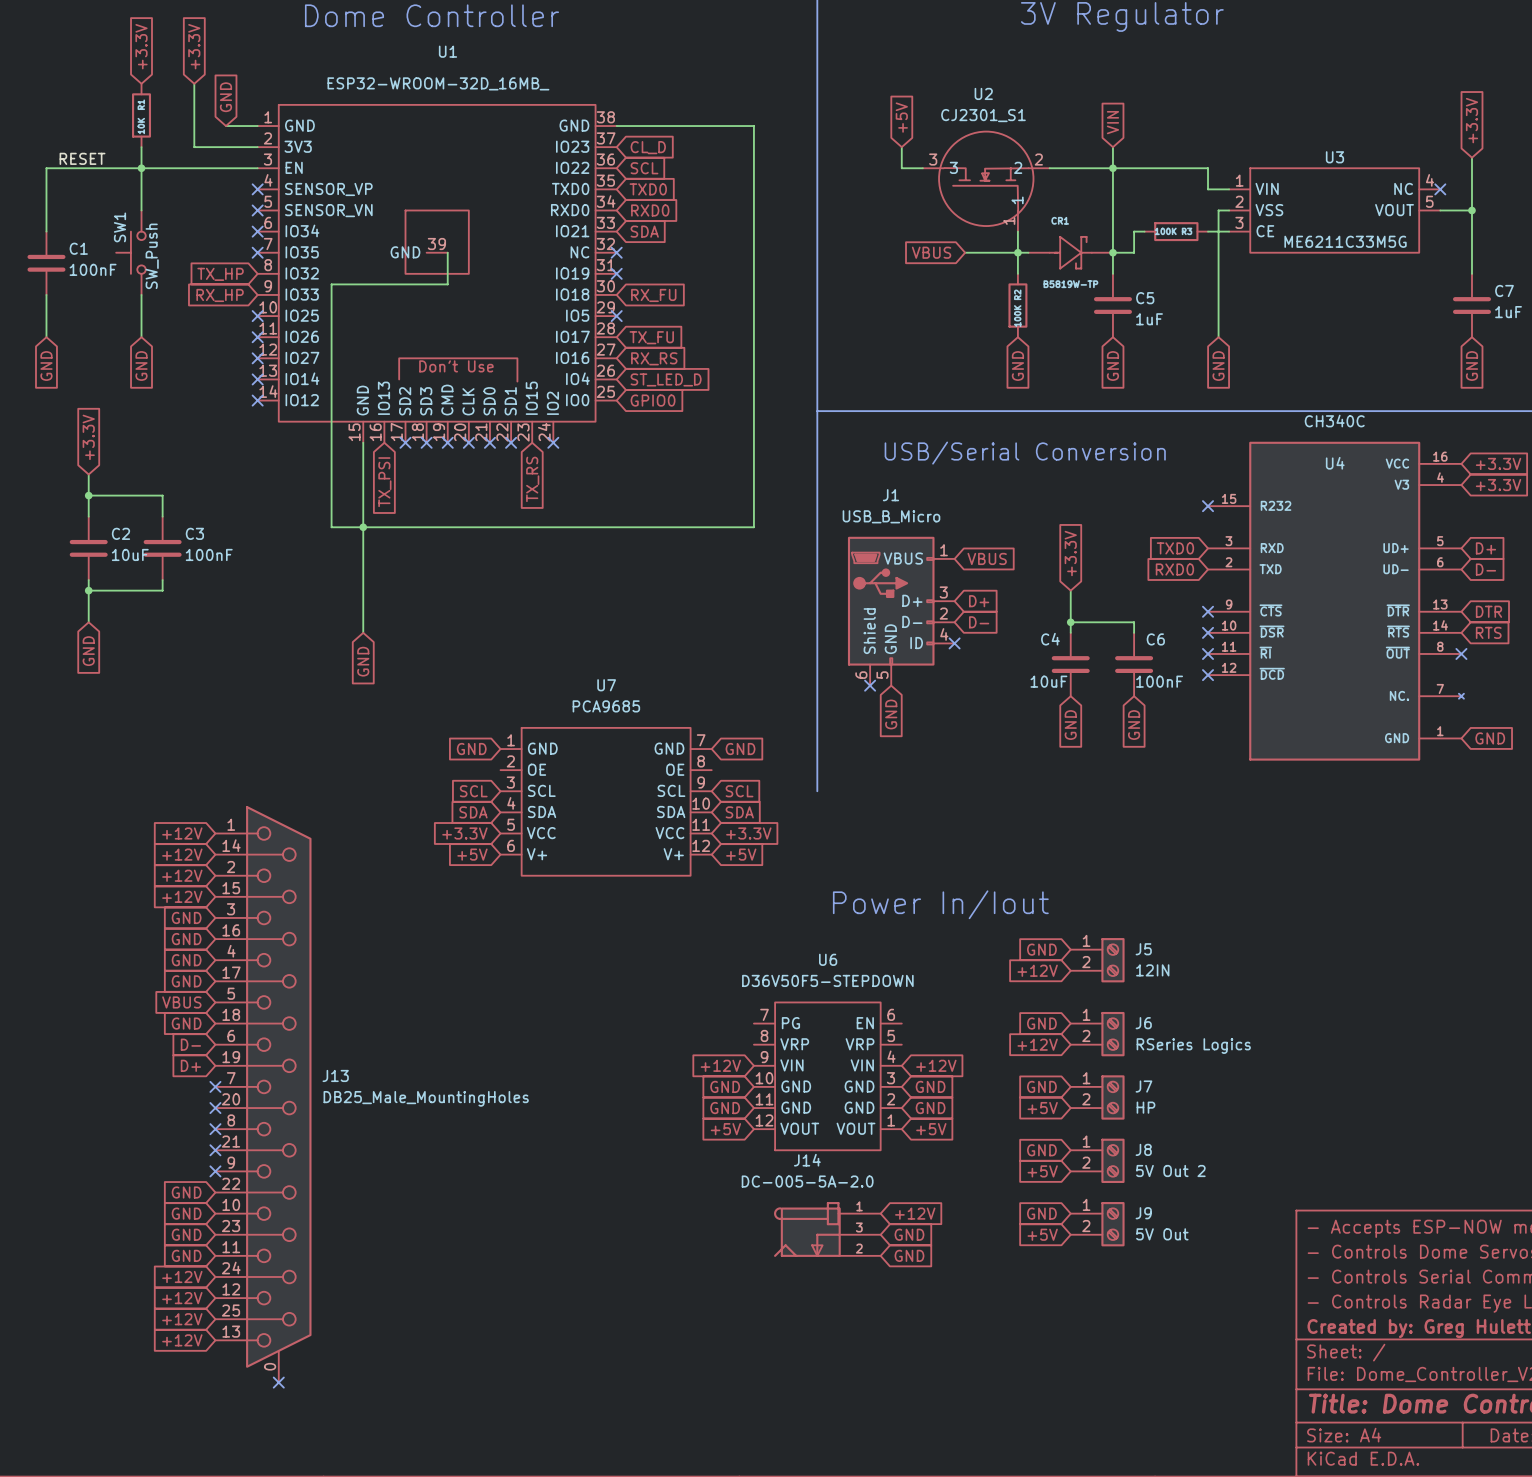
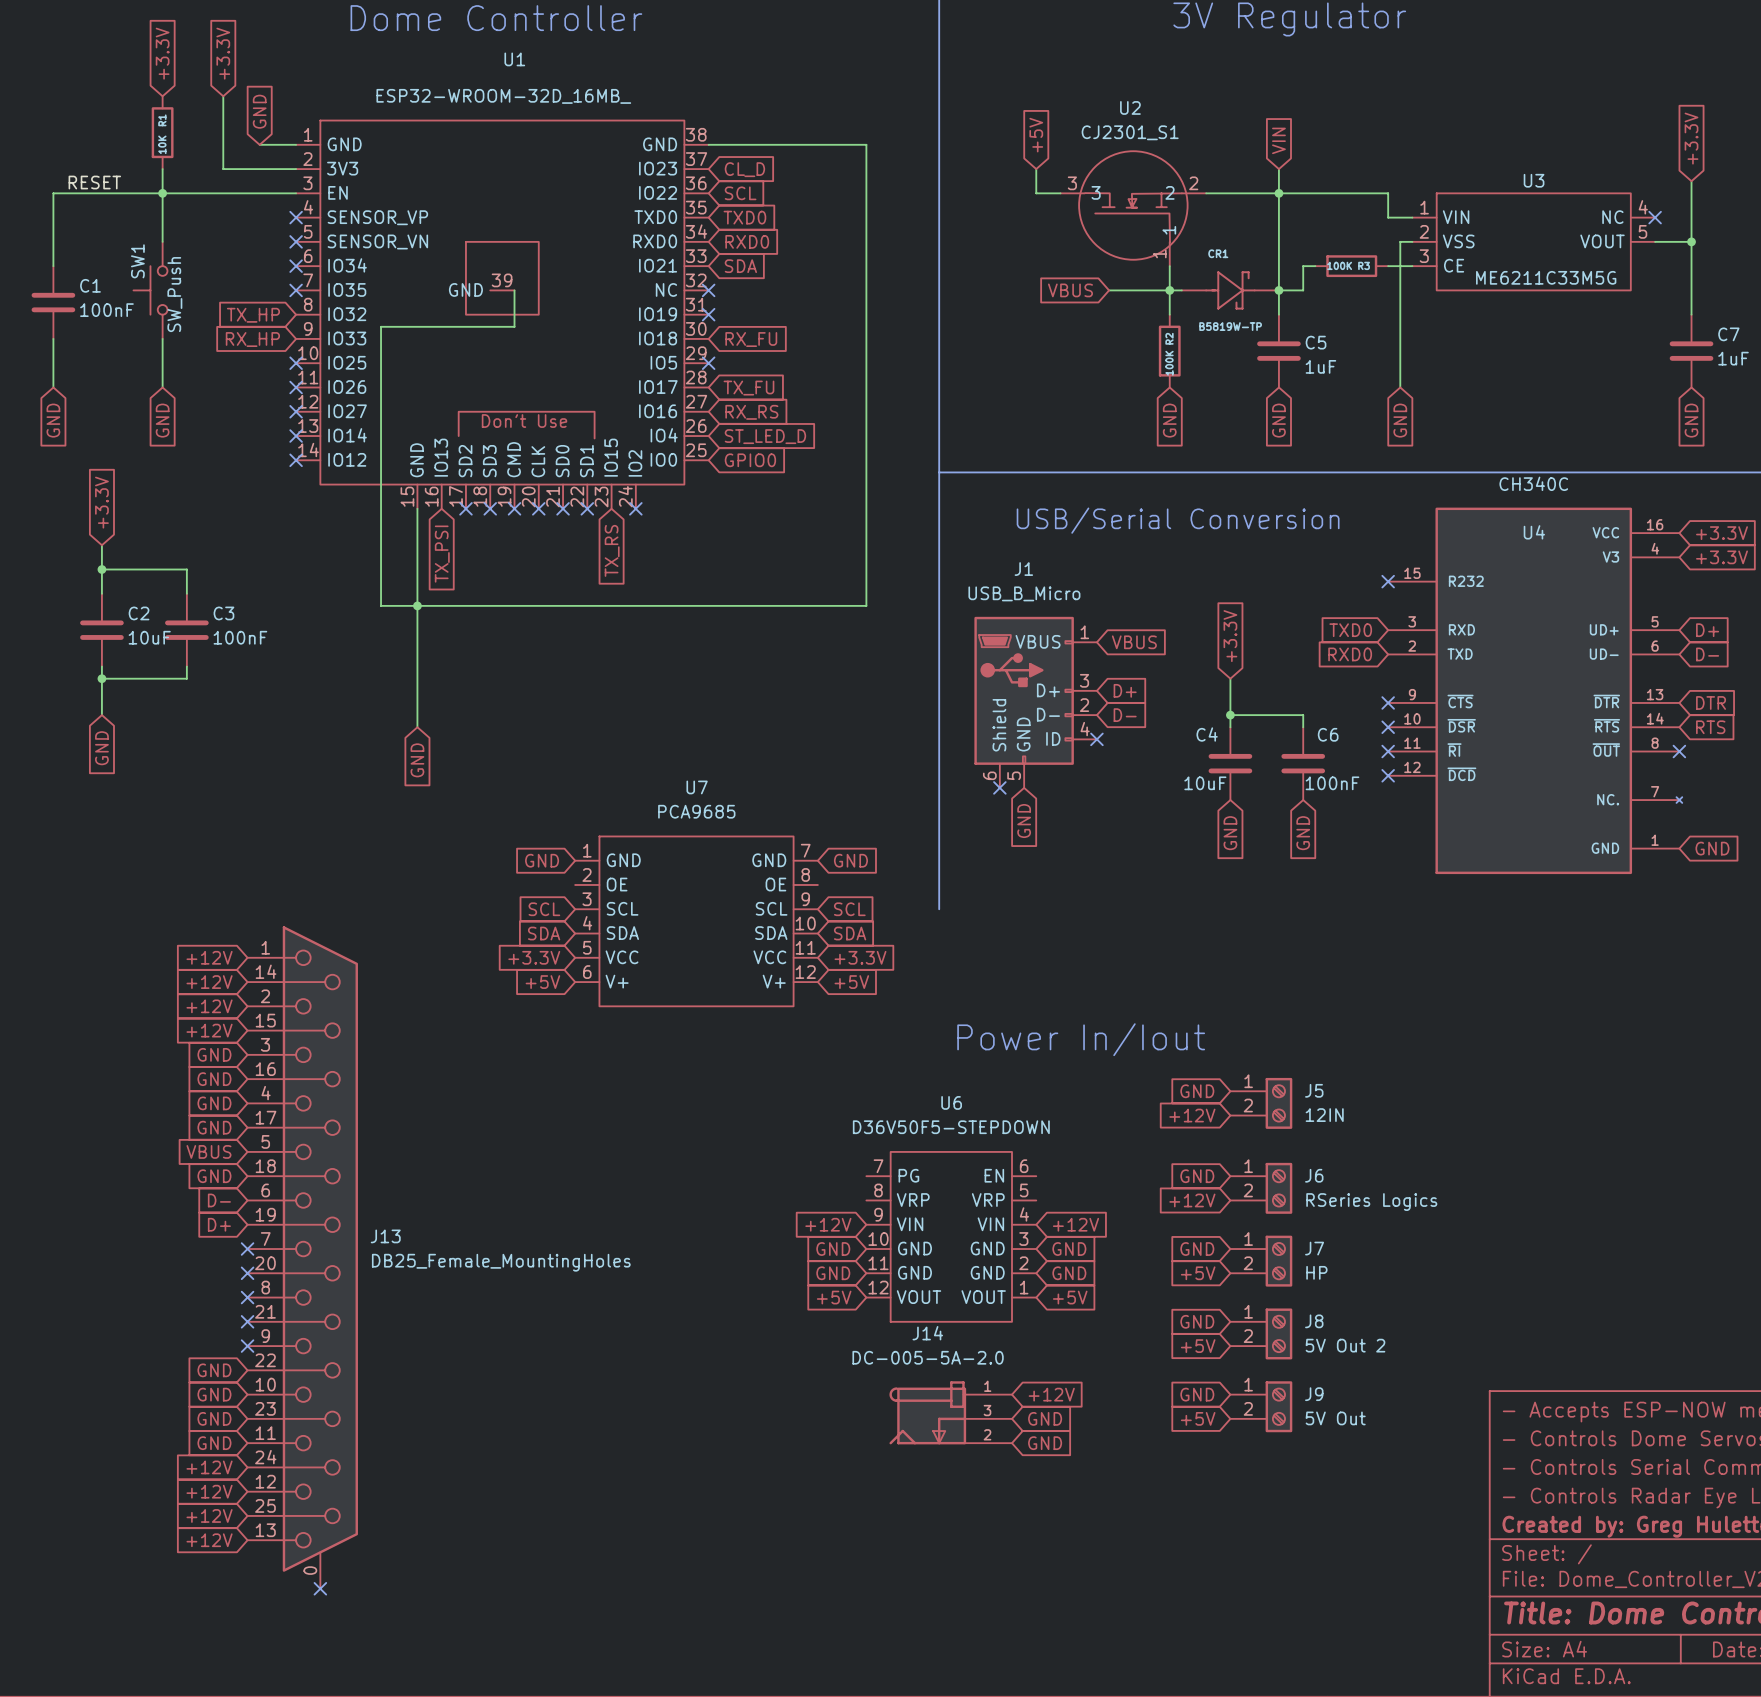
J13 value: DB25_Male_MountingHoles (426, 1098) -> DB25_Female_MountingHoles (501, 1262)

